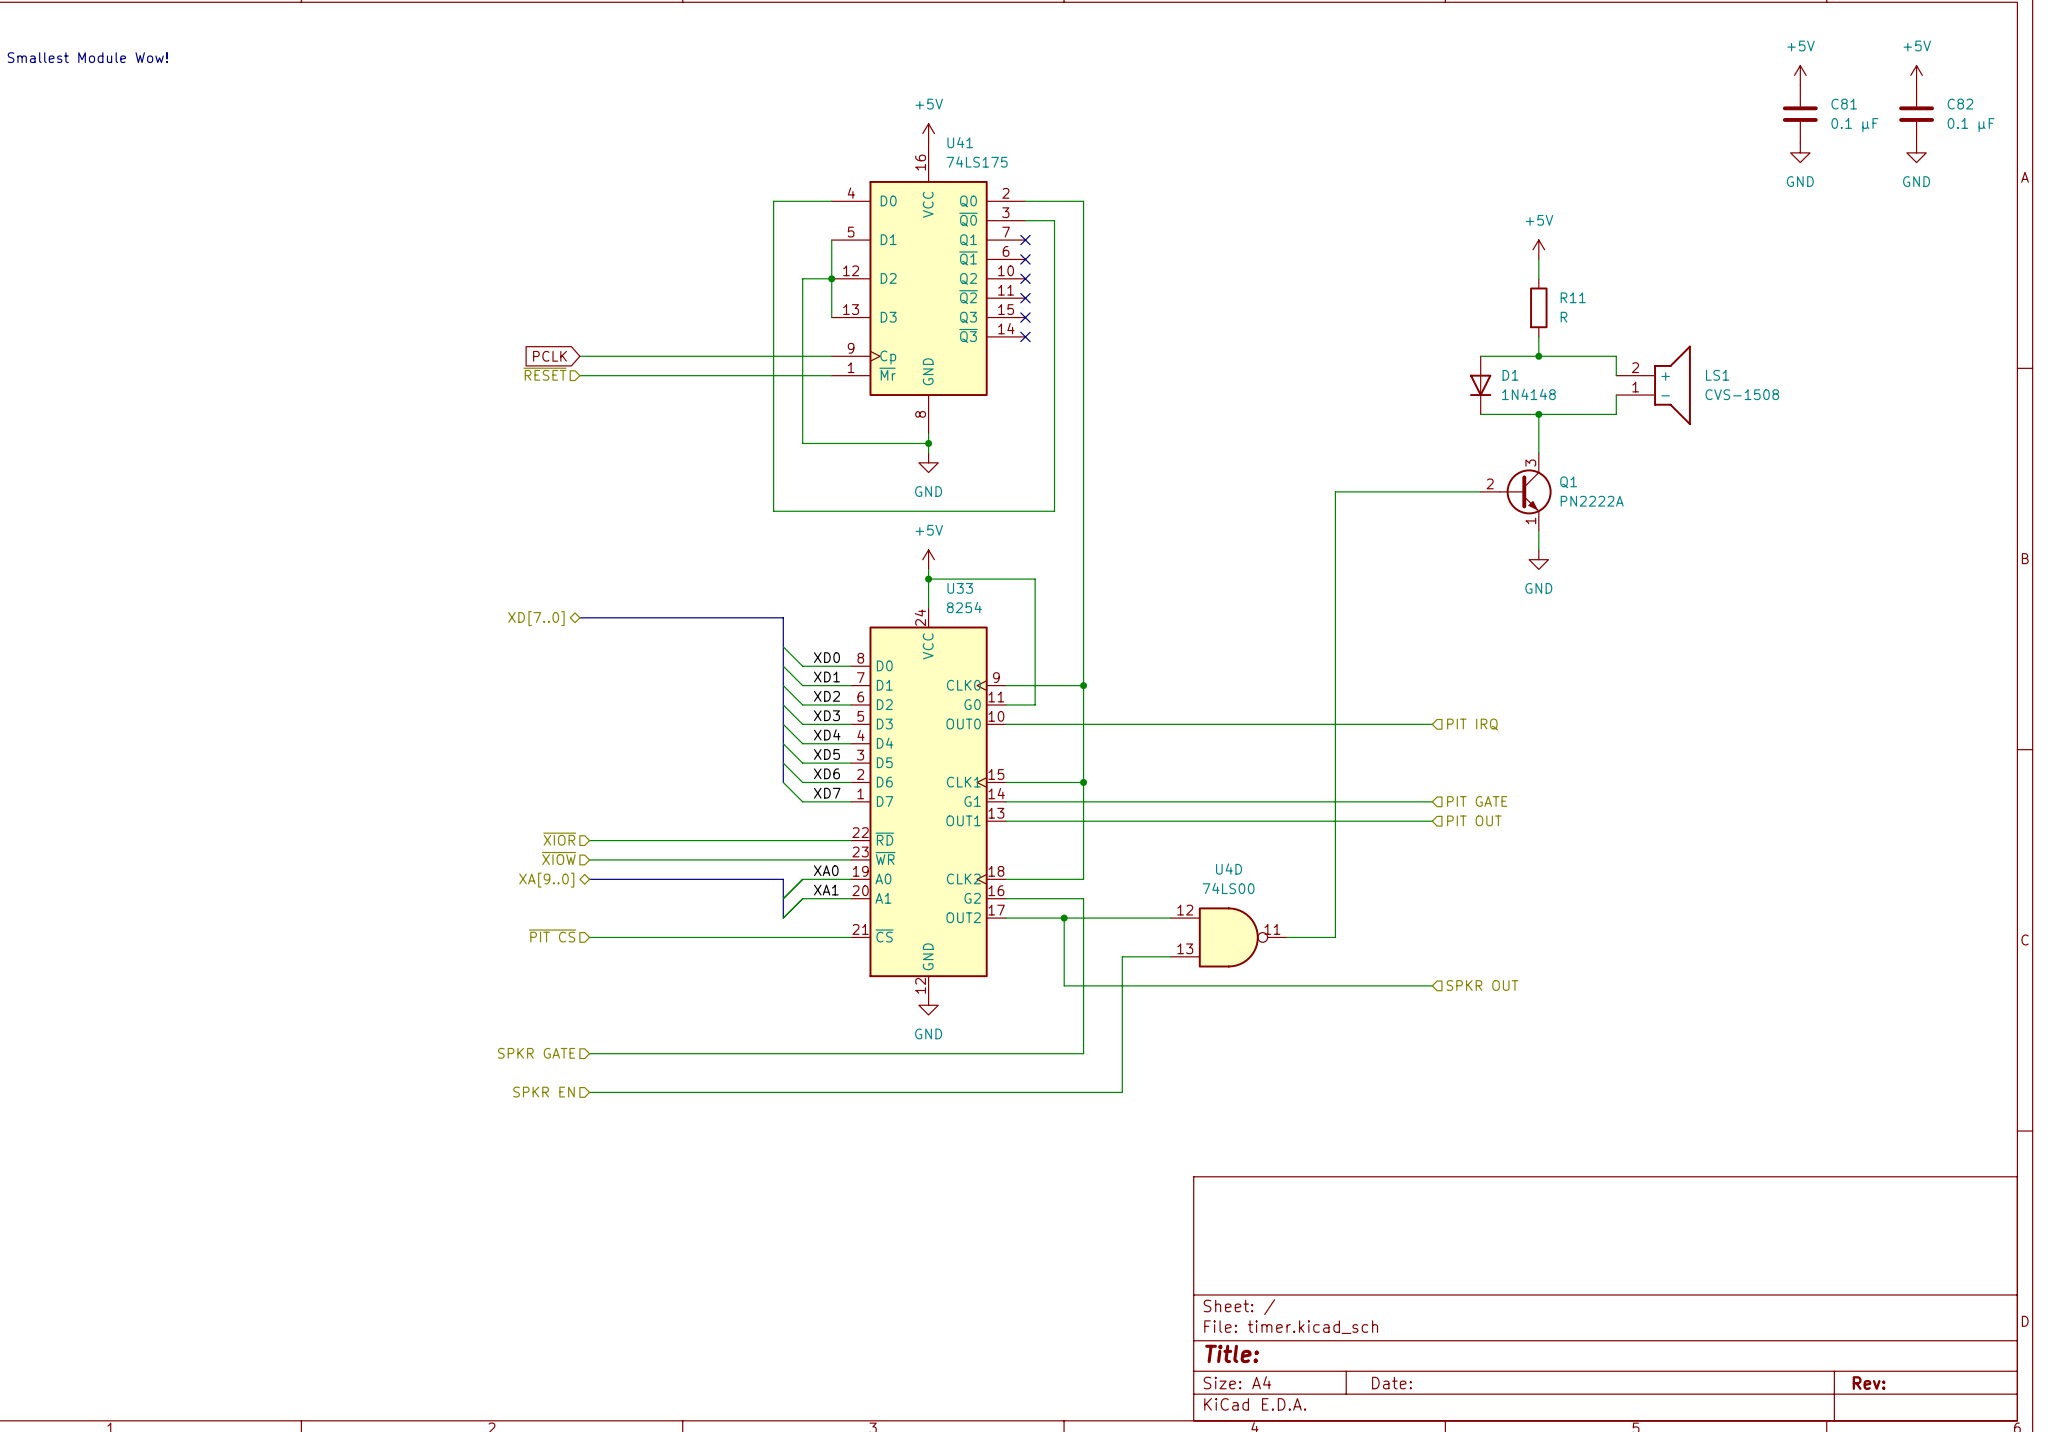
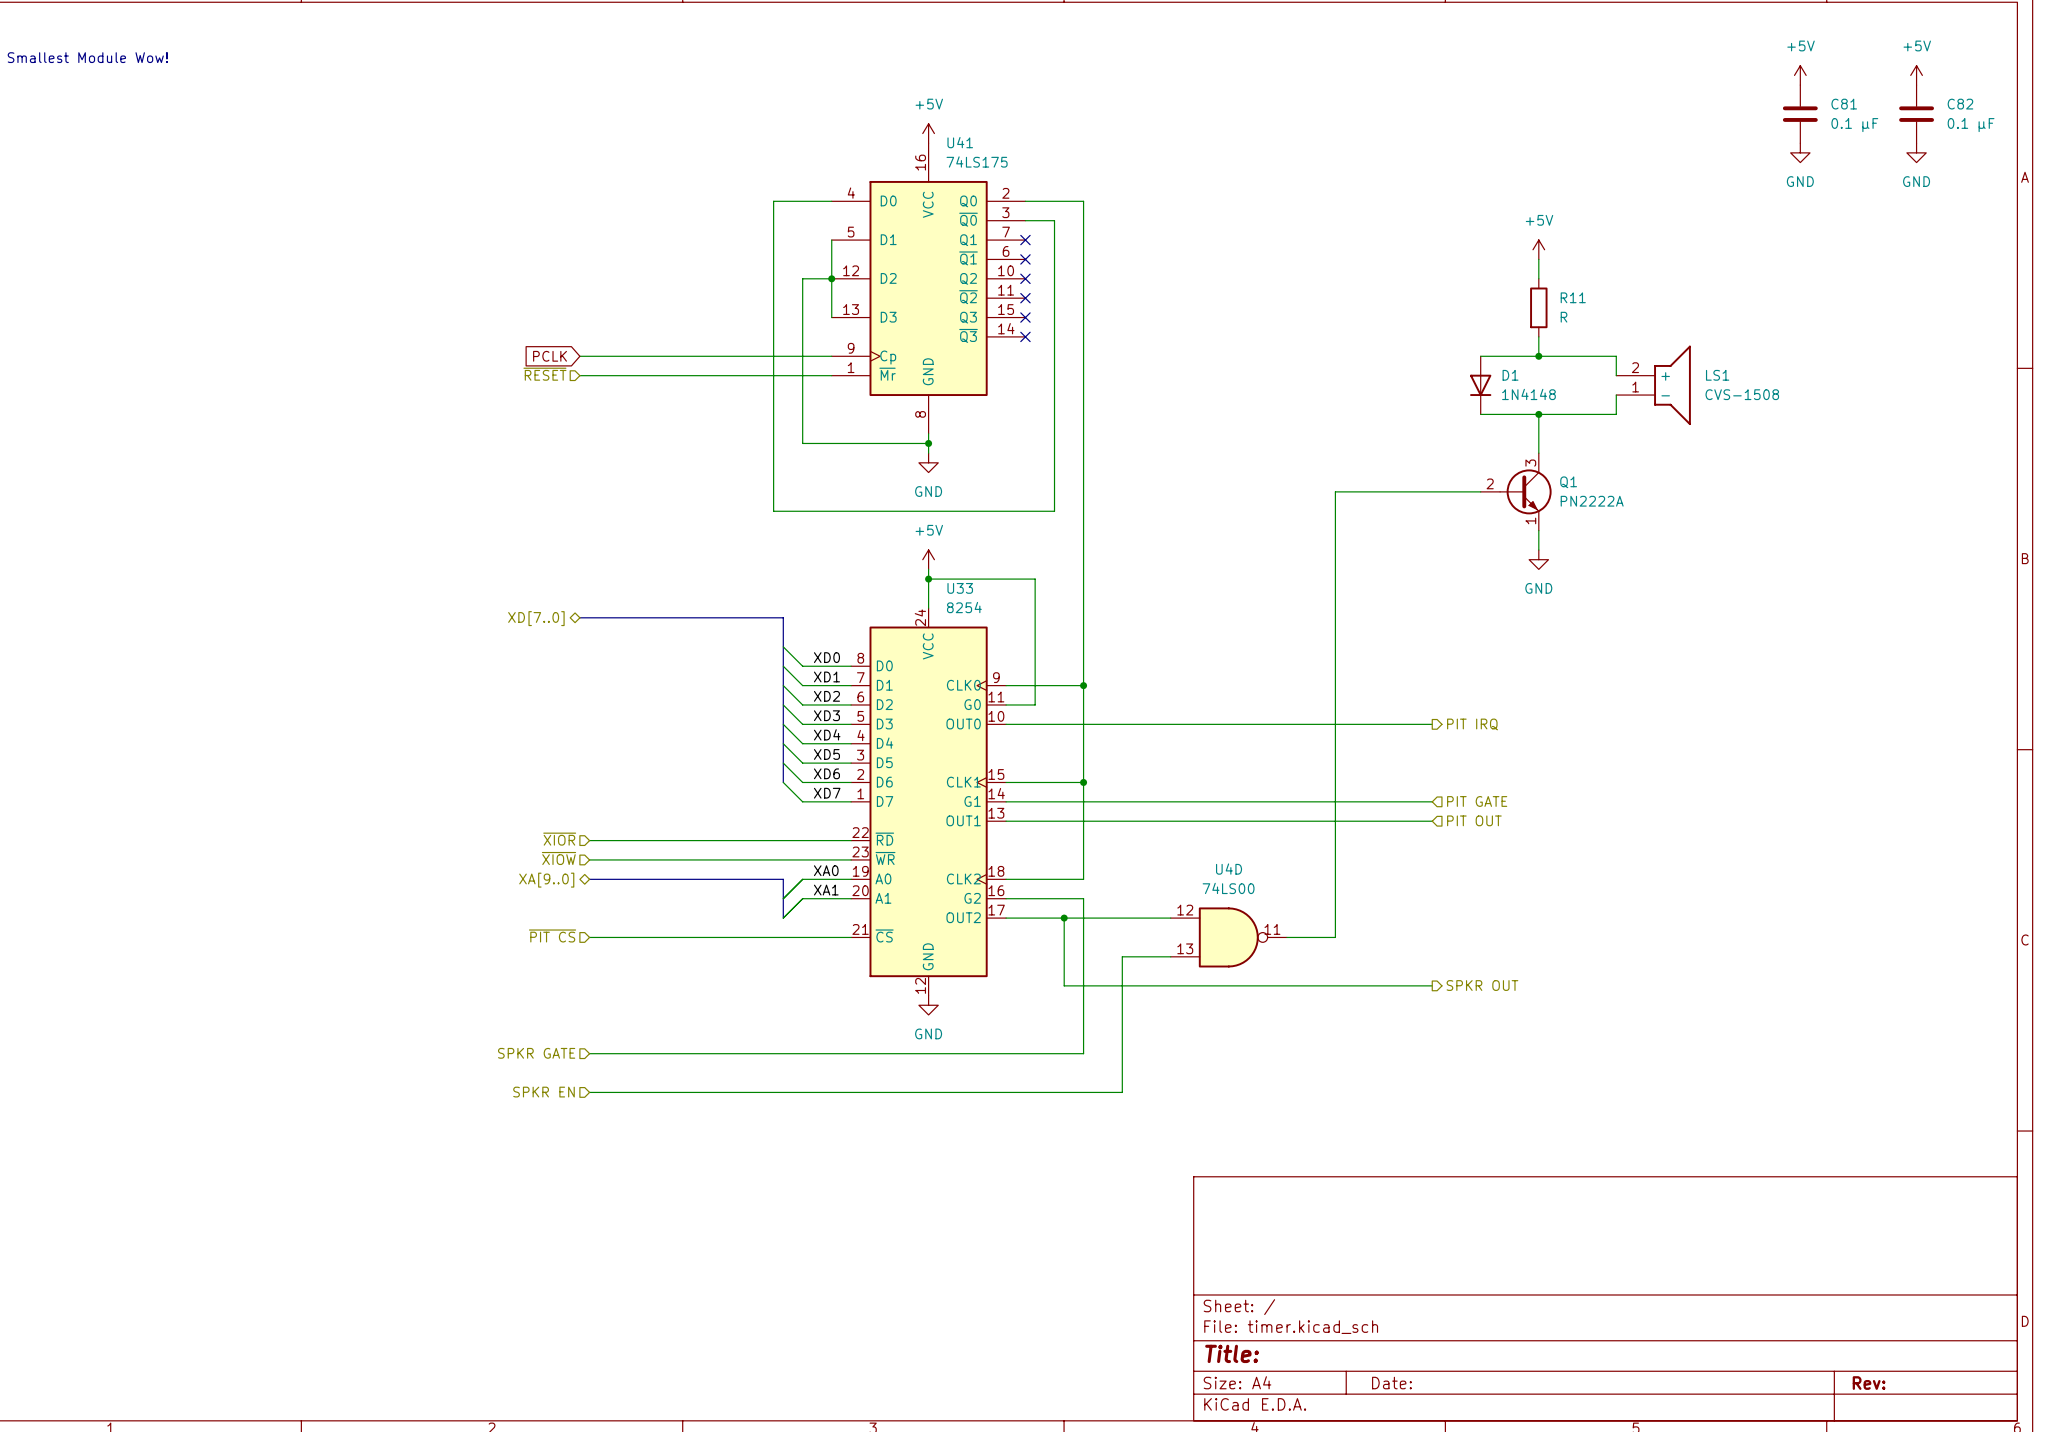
hierarchical label shape: input (1472, 724) -> output (1472, 724)
hierarchical label shape: input (1482, 985) -> output (1482, 985)

